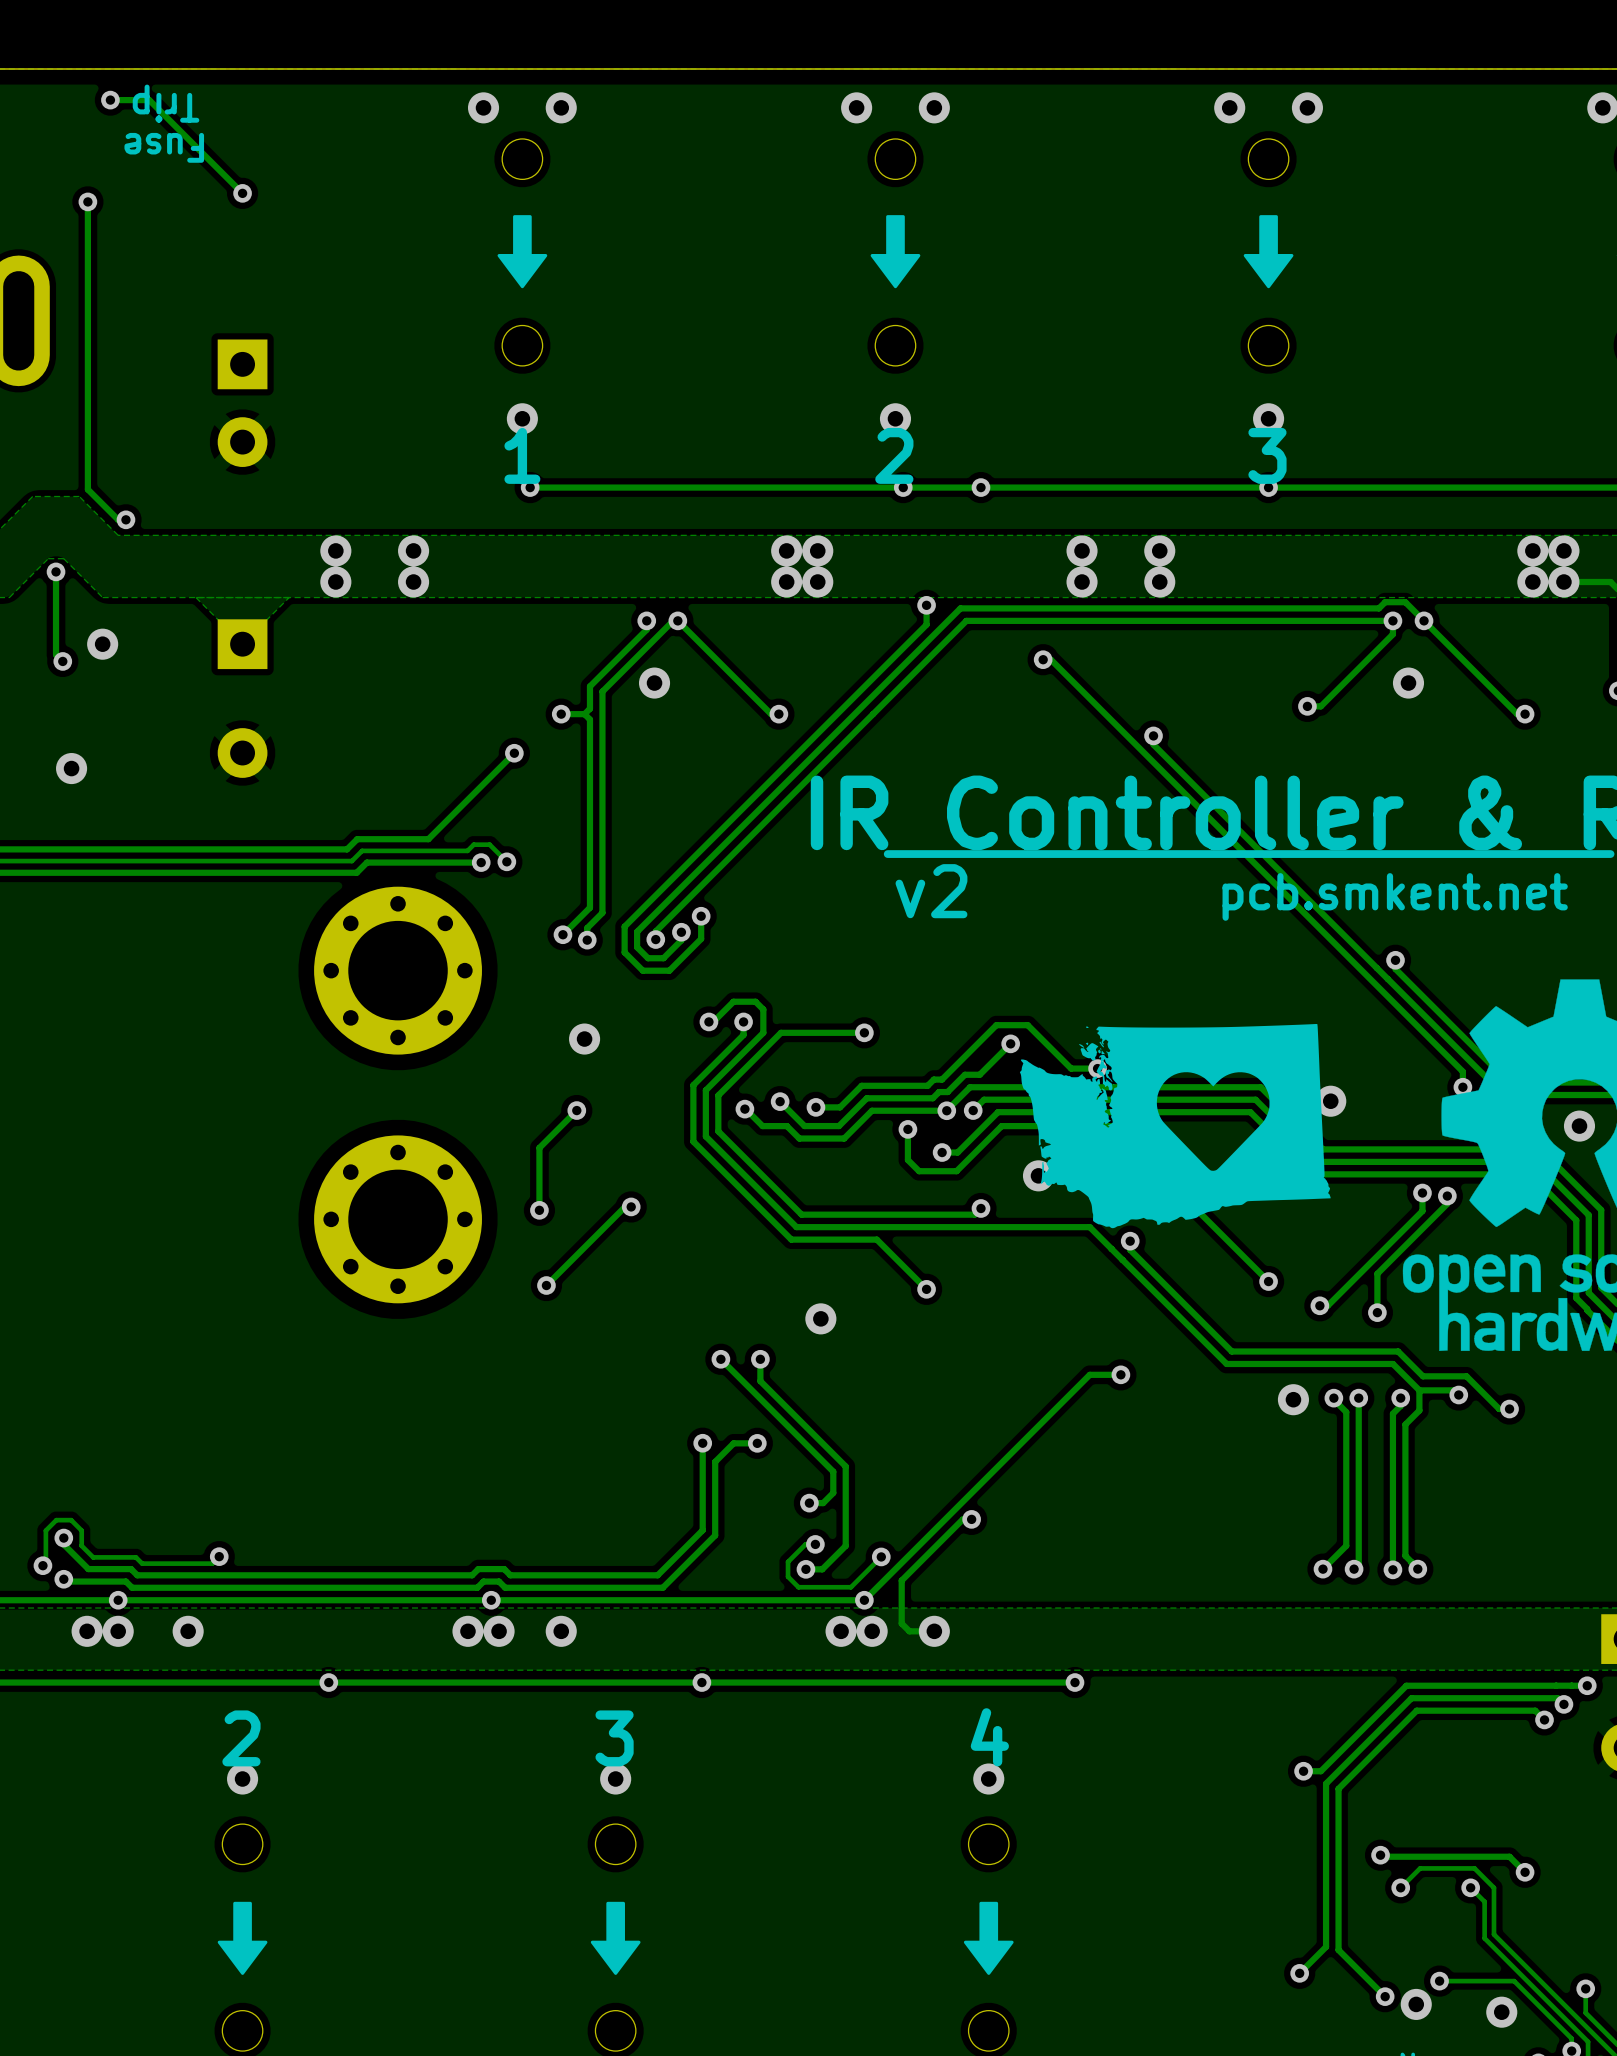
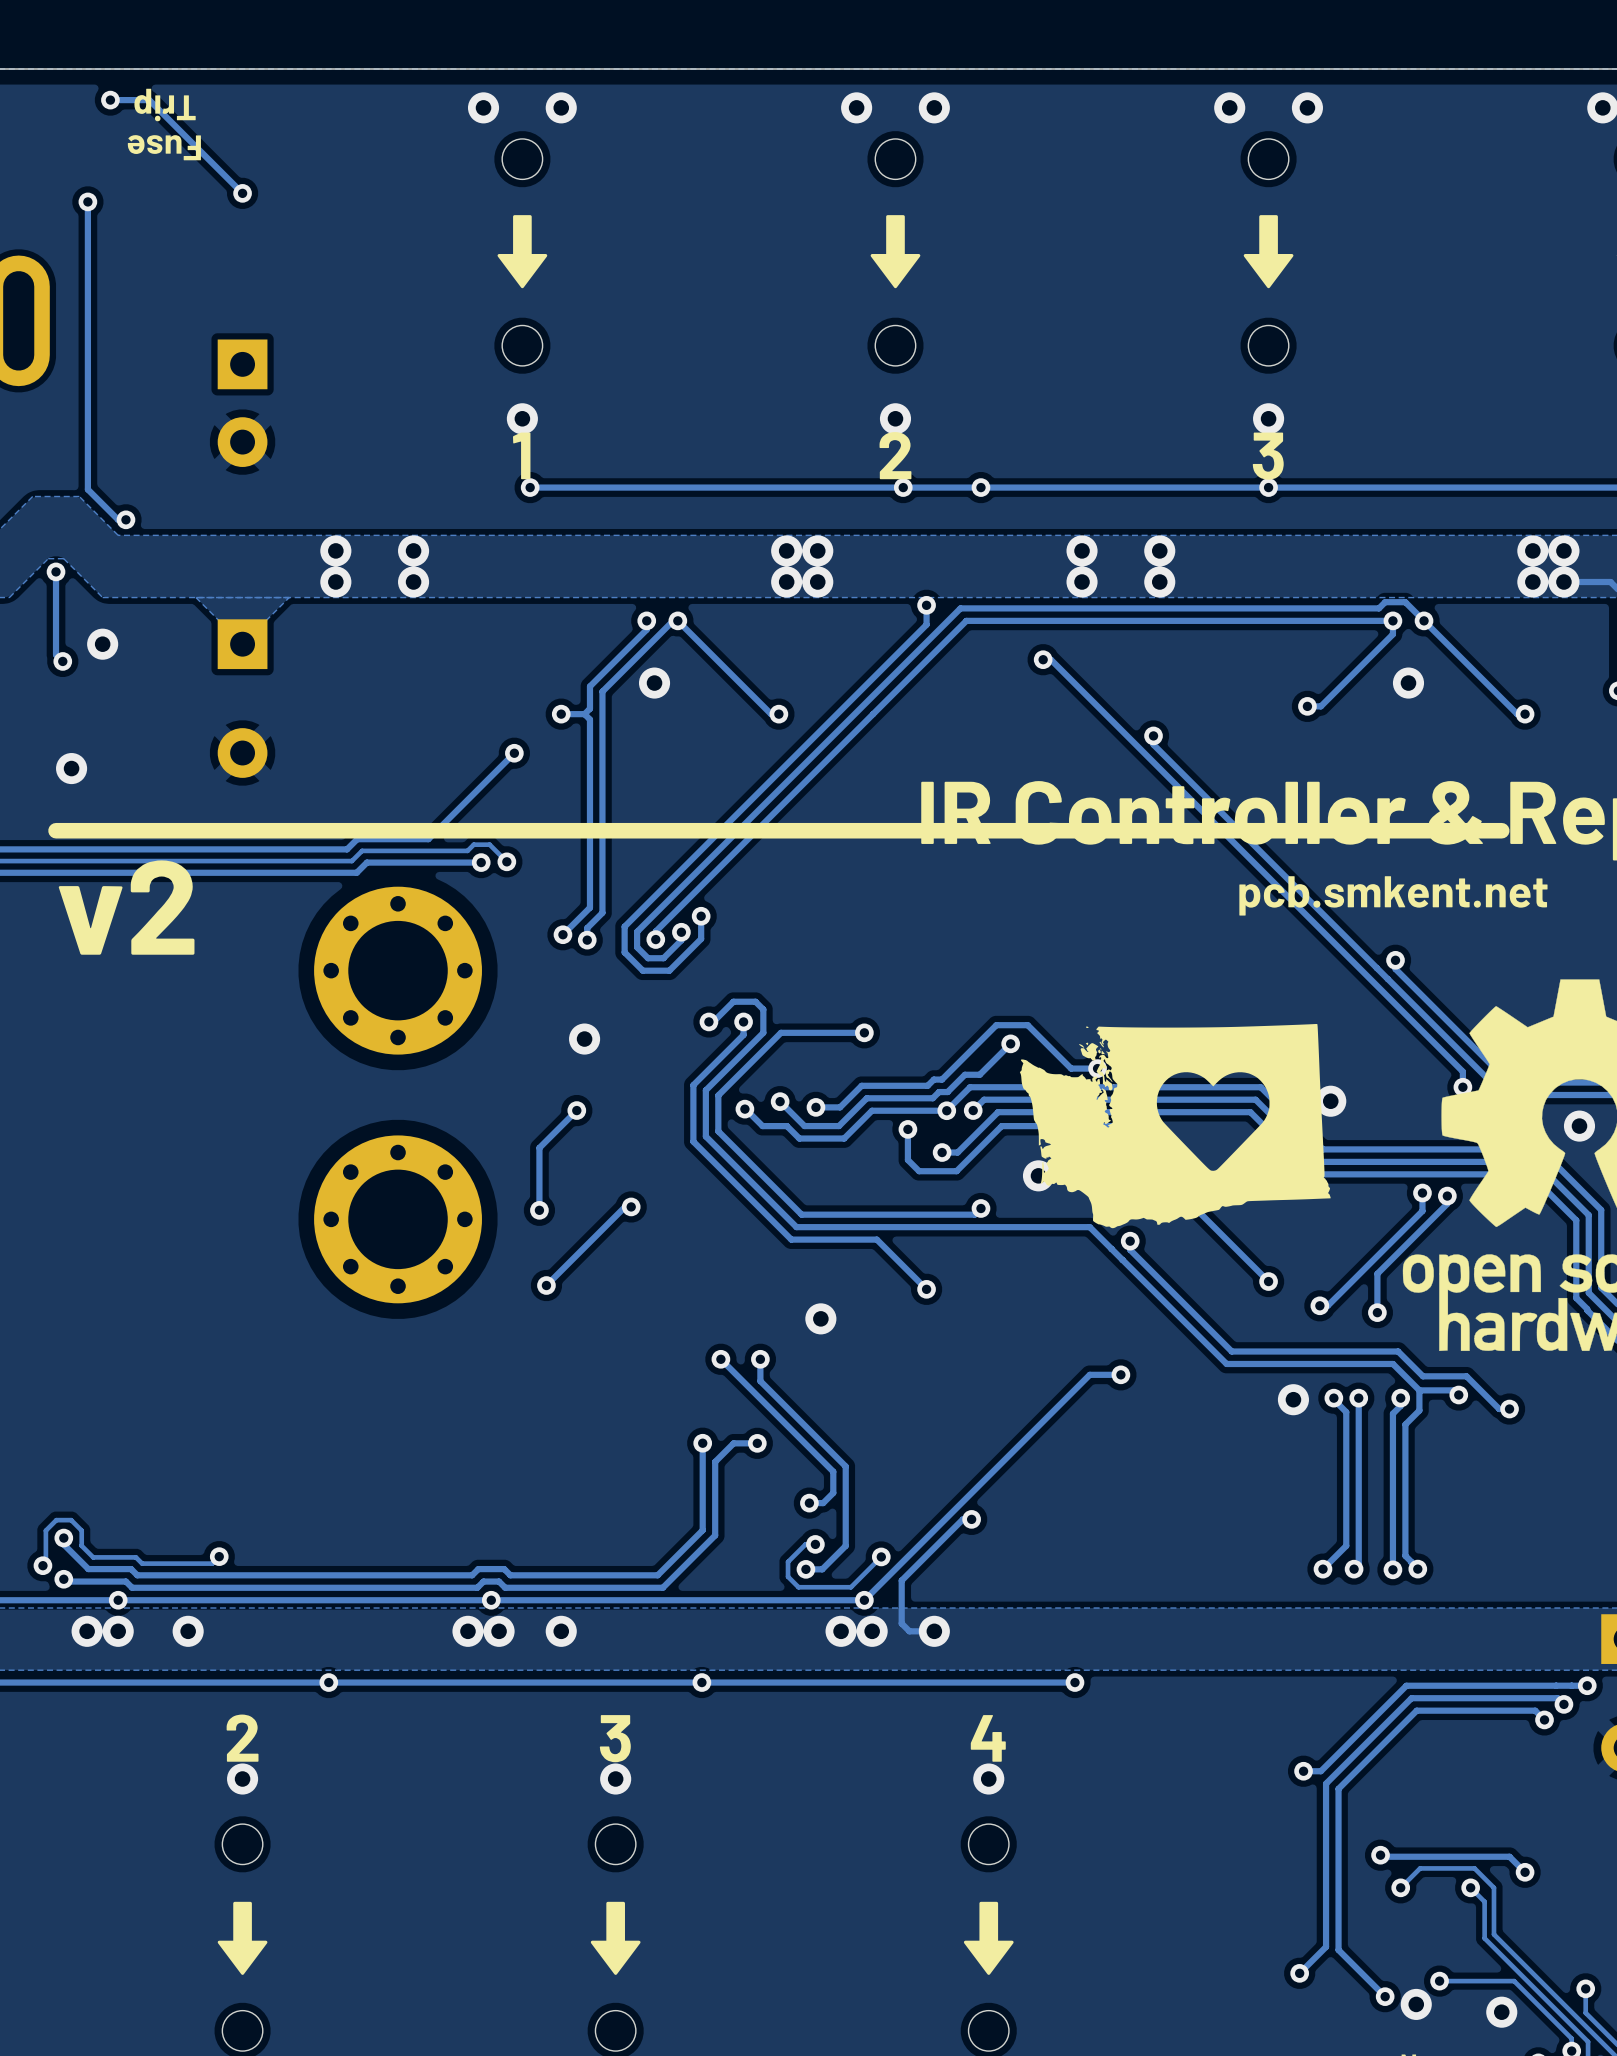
line: none -> (1501, 830) (56, 830)
line: (1610, 854) (887, 854) -> none
text: v2 (931, 891) -> none
text: none -> v2 (126, 907)

